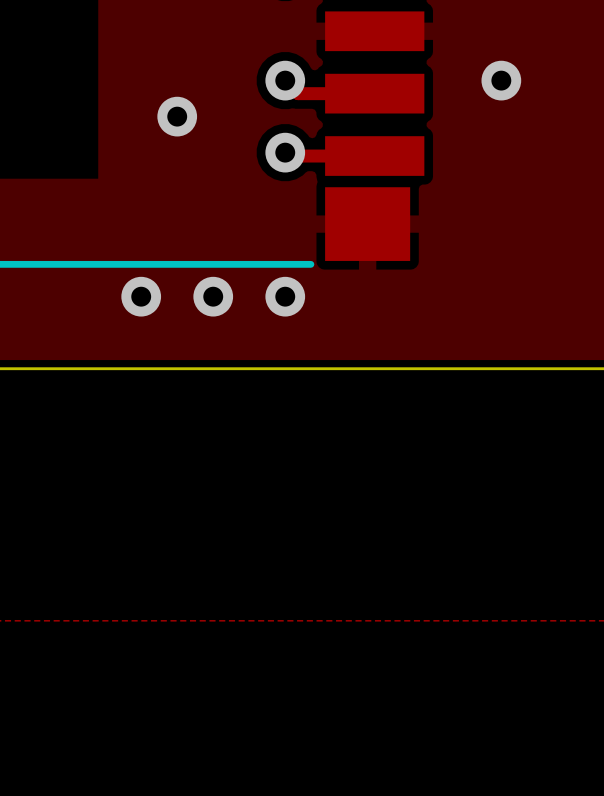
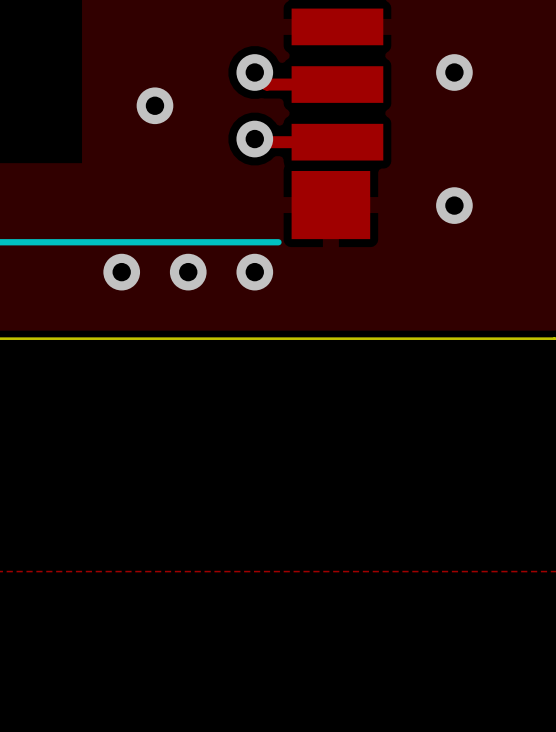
via: none -> (454, 205)

